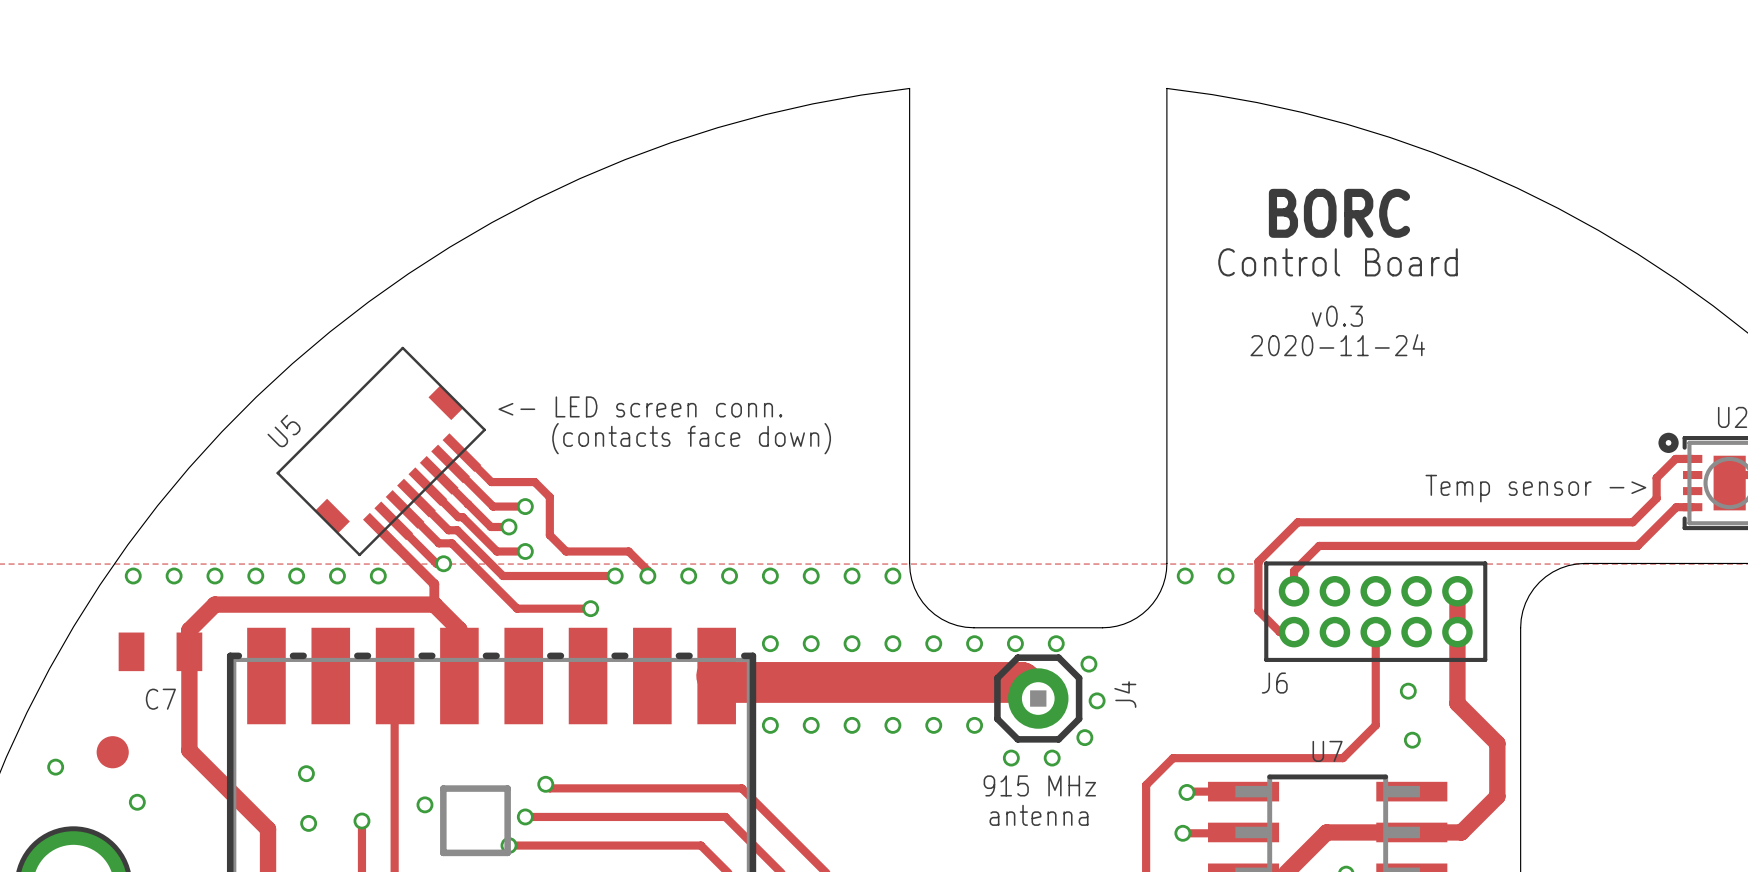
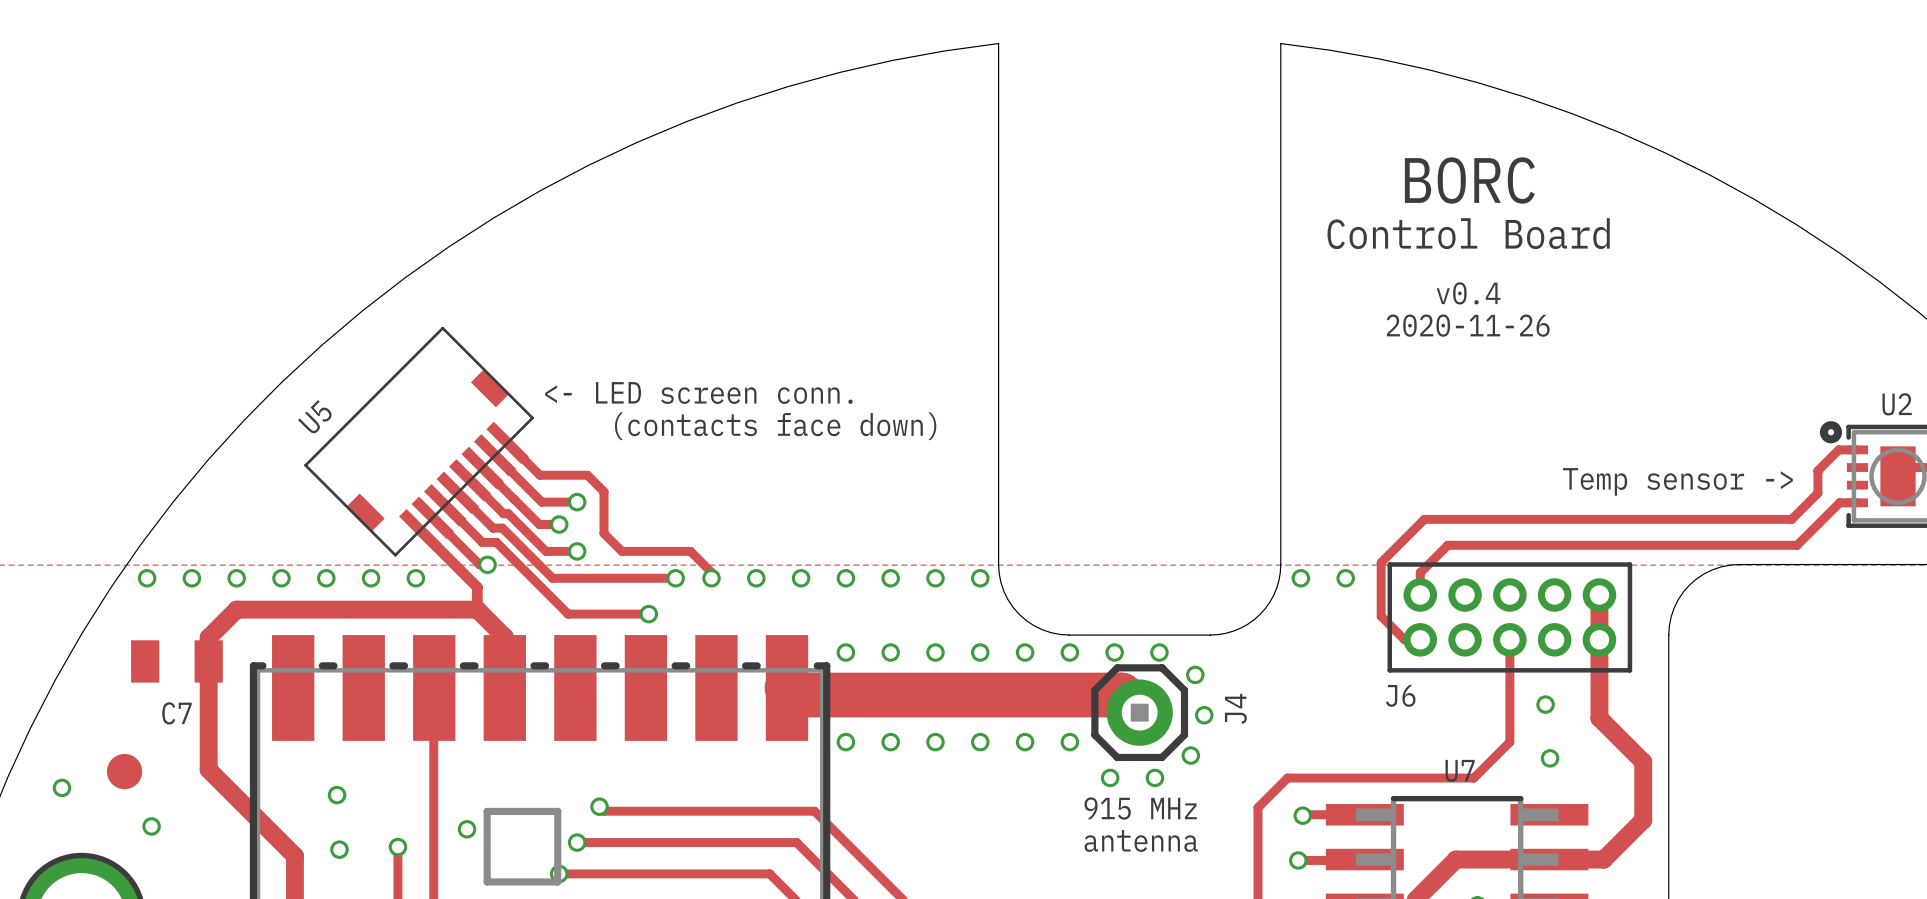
text: v0.3 (1337, 316) -> v0.4 (1468, 293)
text: 2020-11-24 (1337, 345) -> 2020-11-26 (1468, 325)

